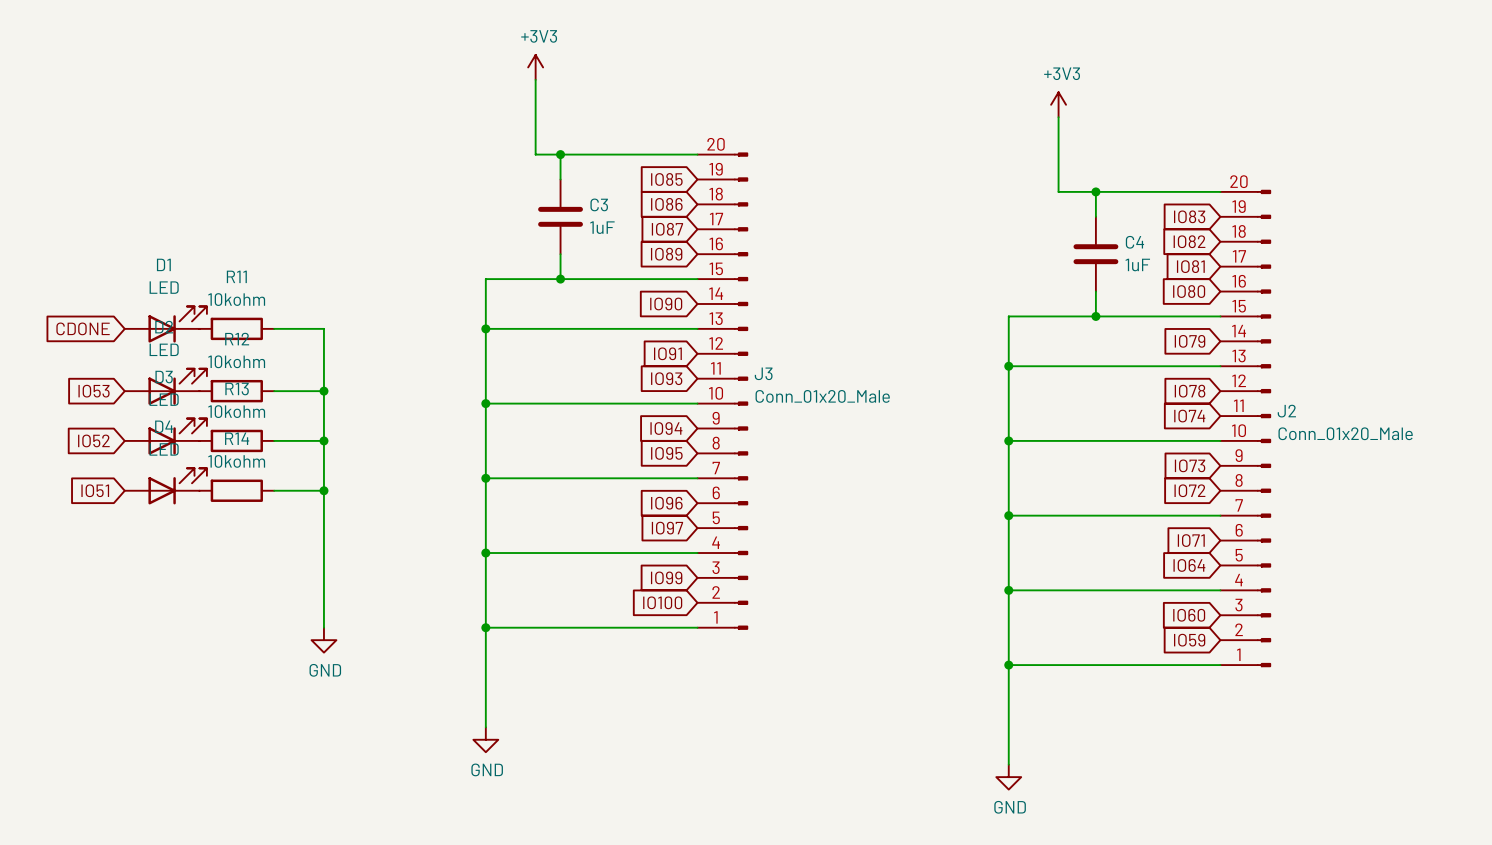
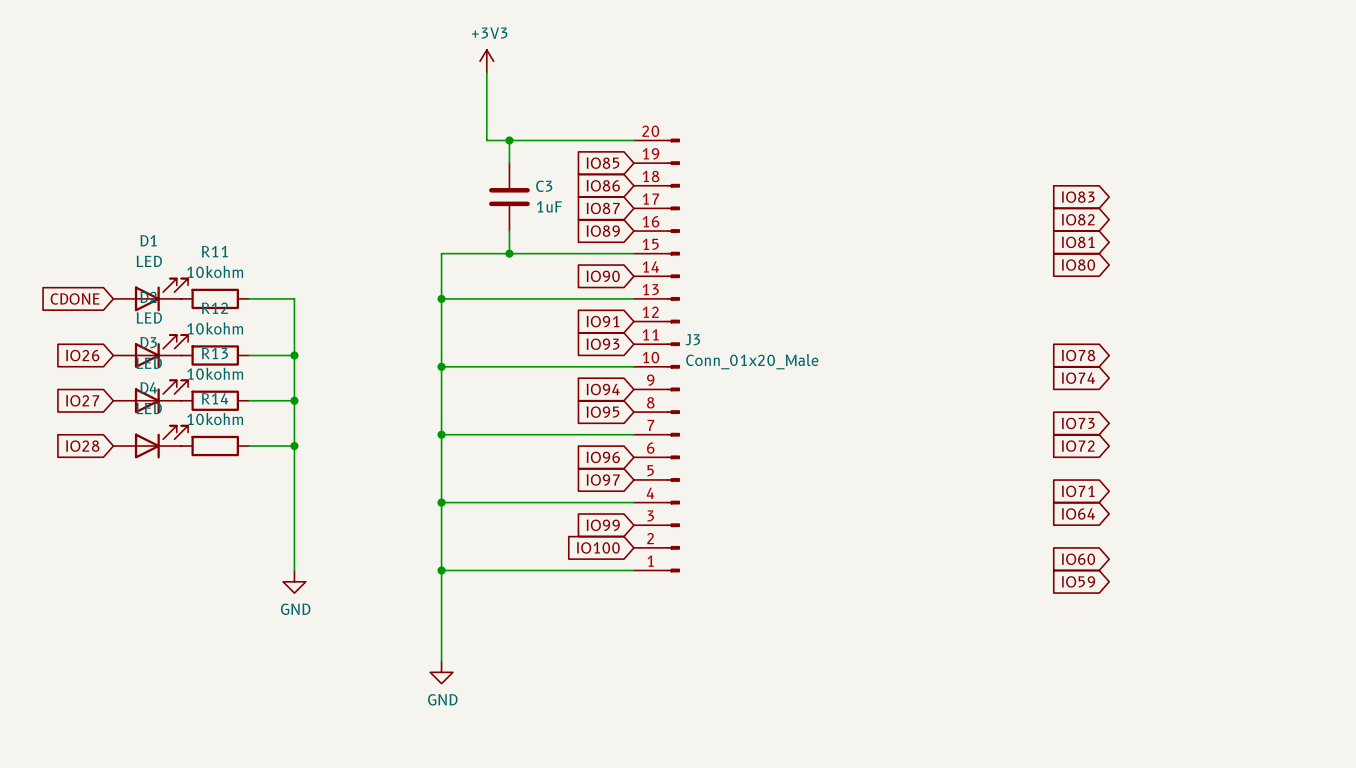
power symbol: +3V3 (1058, 104) -> none
wire: (1058, 117) (1058, 191) (1220, 191) -> none
wire: (1095, 191) (1095, 216) -> none
junction: (1095, 191) -> none
C4: 1uF (1095, 254) -> none
wire: (1095, 291) (1095, 316) -> none
junction: (1095, 316) -> none
wire: (1220, 316) (1008, 316) (1008, 764) -> none
global label: IO79 (1190, 341) -> none
wire: (1008, 366) (1220, 366) -> none
junction: (1008, 366) -> none
global label: IO53 (94, 391) -> IO26 (82, 355)
J2: Conn_01x20_Male (1245, 428) -> none
global label: IO52 (93, 440) -> IO27 (82, 400)
wire: (1008, 440) (1220, 440) -> none
junction: (1008, 440) -> none
global label: IO51 (95, 490) -> IO28 (82, 446)
wire: (1008, 515) (1220, 515) -> none
junction: (1008, 515) -> none
wire: (1008, 590) (1220, 590) -> none
junction: (1008, 590) -> none
wire: (1008, 665) (1220, 665) -> none
junction: (1008, 665) -> none
power symbol: GND (1008, 777) -> none

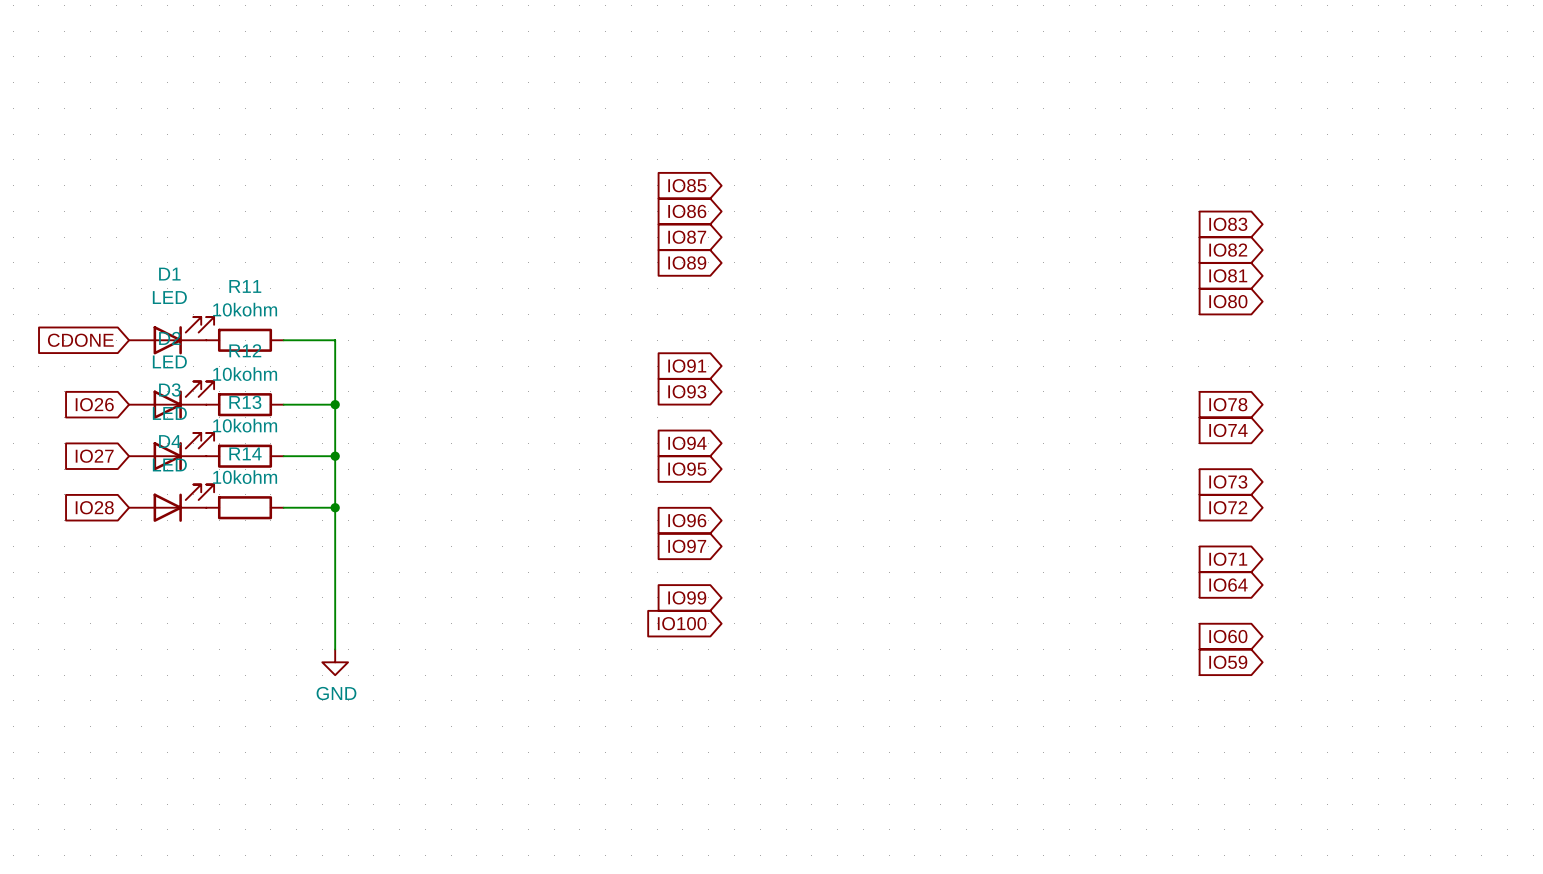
power symbol: +3V3 (486, 61) -> none
wire: (486, 72) (486, 140) (633, 140) -> none
wire: (509, 140) (509, 163) -> none
junction: (509, 140) -> none
C3: 1uF (509, 197) -> none
wire: (509, 231) (509, 253) -> none
junction: (509, 253) -> none
wire: (633, 253) (441, 253) (441, 661) -> none
global label: IO90 (603, 276) -> none
wire: (441, 298) (633, 298) -> none
junction: (441, 298) -> none
J3: Conn_01x20_Male (656, 355) -> none
wire: (441, 366) (633, 366) -> none
junction: (441, 366) -> none
wire: (441, 434) (633, 434) -> none
junction: (441, 434) -> none
wire: (441, 502) (633, 502) -> none
junction: (441, 502) -> none
wire: (441, 570) (633, 570) -> none
junction: (441, 570) -> none
power symbol: GND (441, 672) -> none

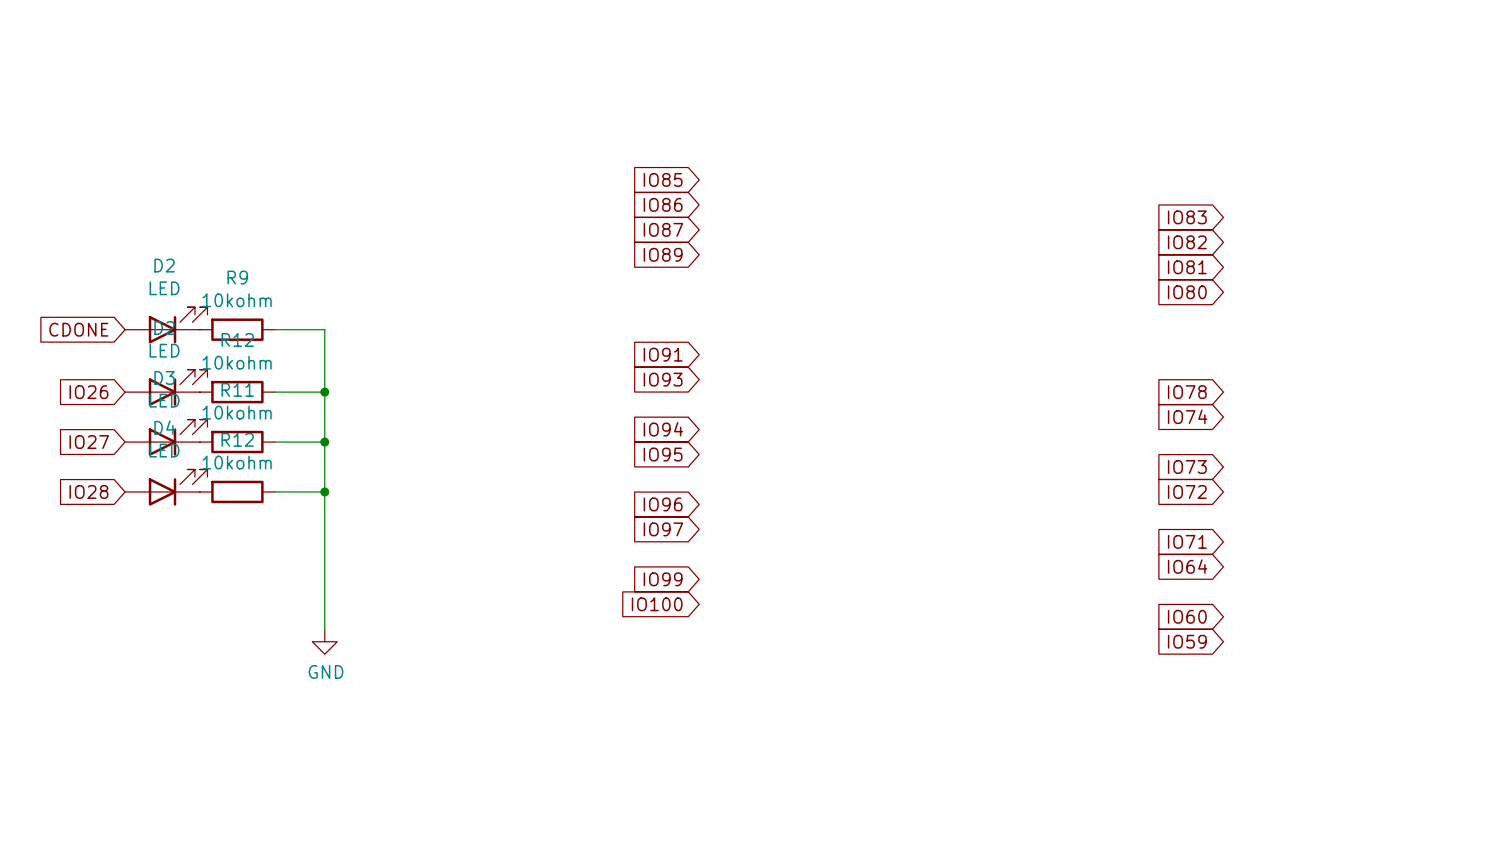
D1 name: D1 (169, 274) -> D2 (164, 265)
R11 name: R11 (245, 286) -> R9 (237, 277)
R13 name: R13 (245, 402) -> R11 (237, 389)
R14 name: R14 (245, 453) -> R12 (237, 439)

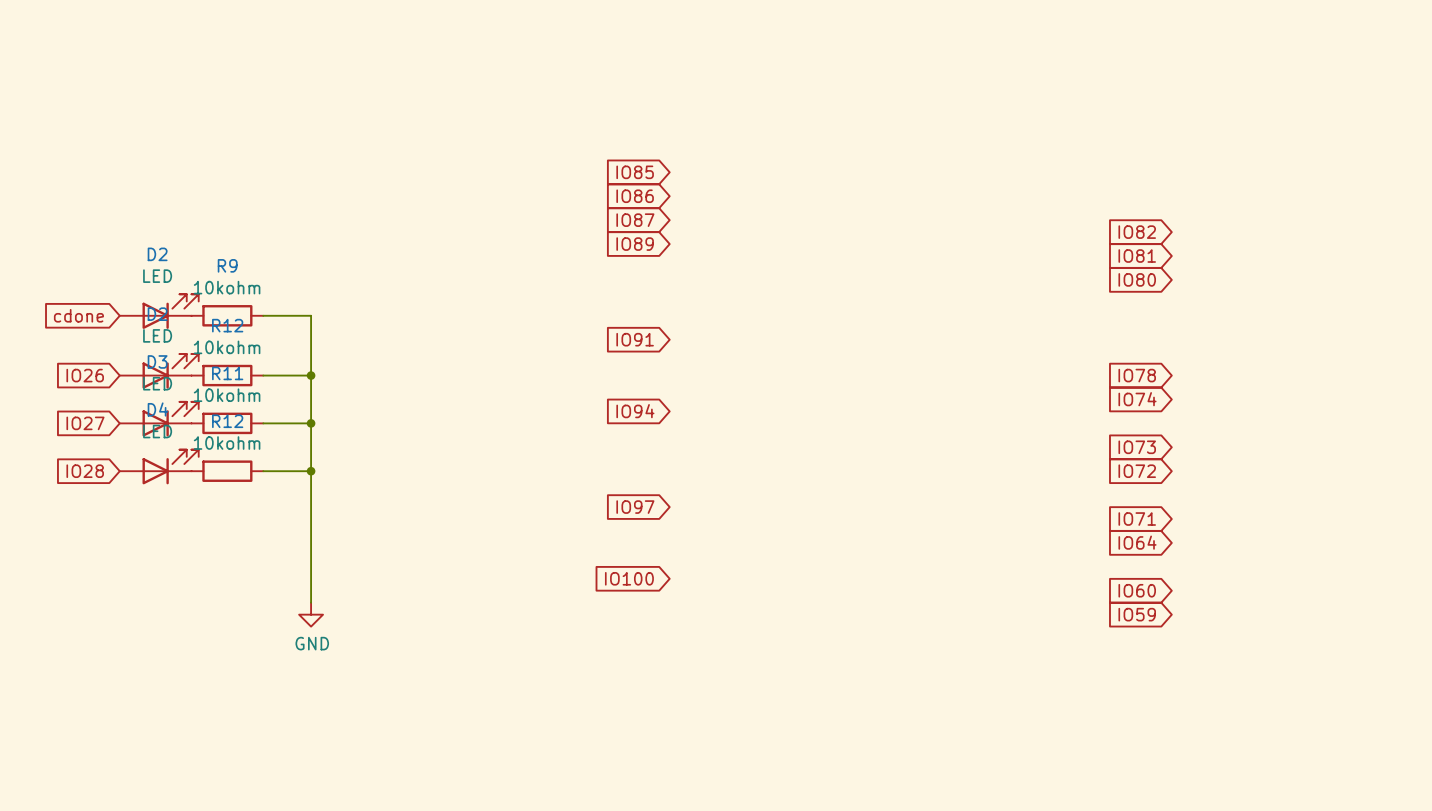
global label: IO83 (1187, 217) -> none
global label: CDONE (78, 329) -> cdone (78, 315)
global label: IO93 (663, 379) -> none
global label: IO95 (663, 454) -> none
global label: IO96 (663, 504) -> none
global label: IO99 (663, 579) -> none

